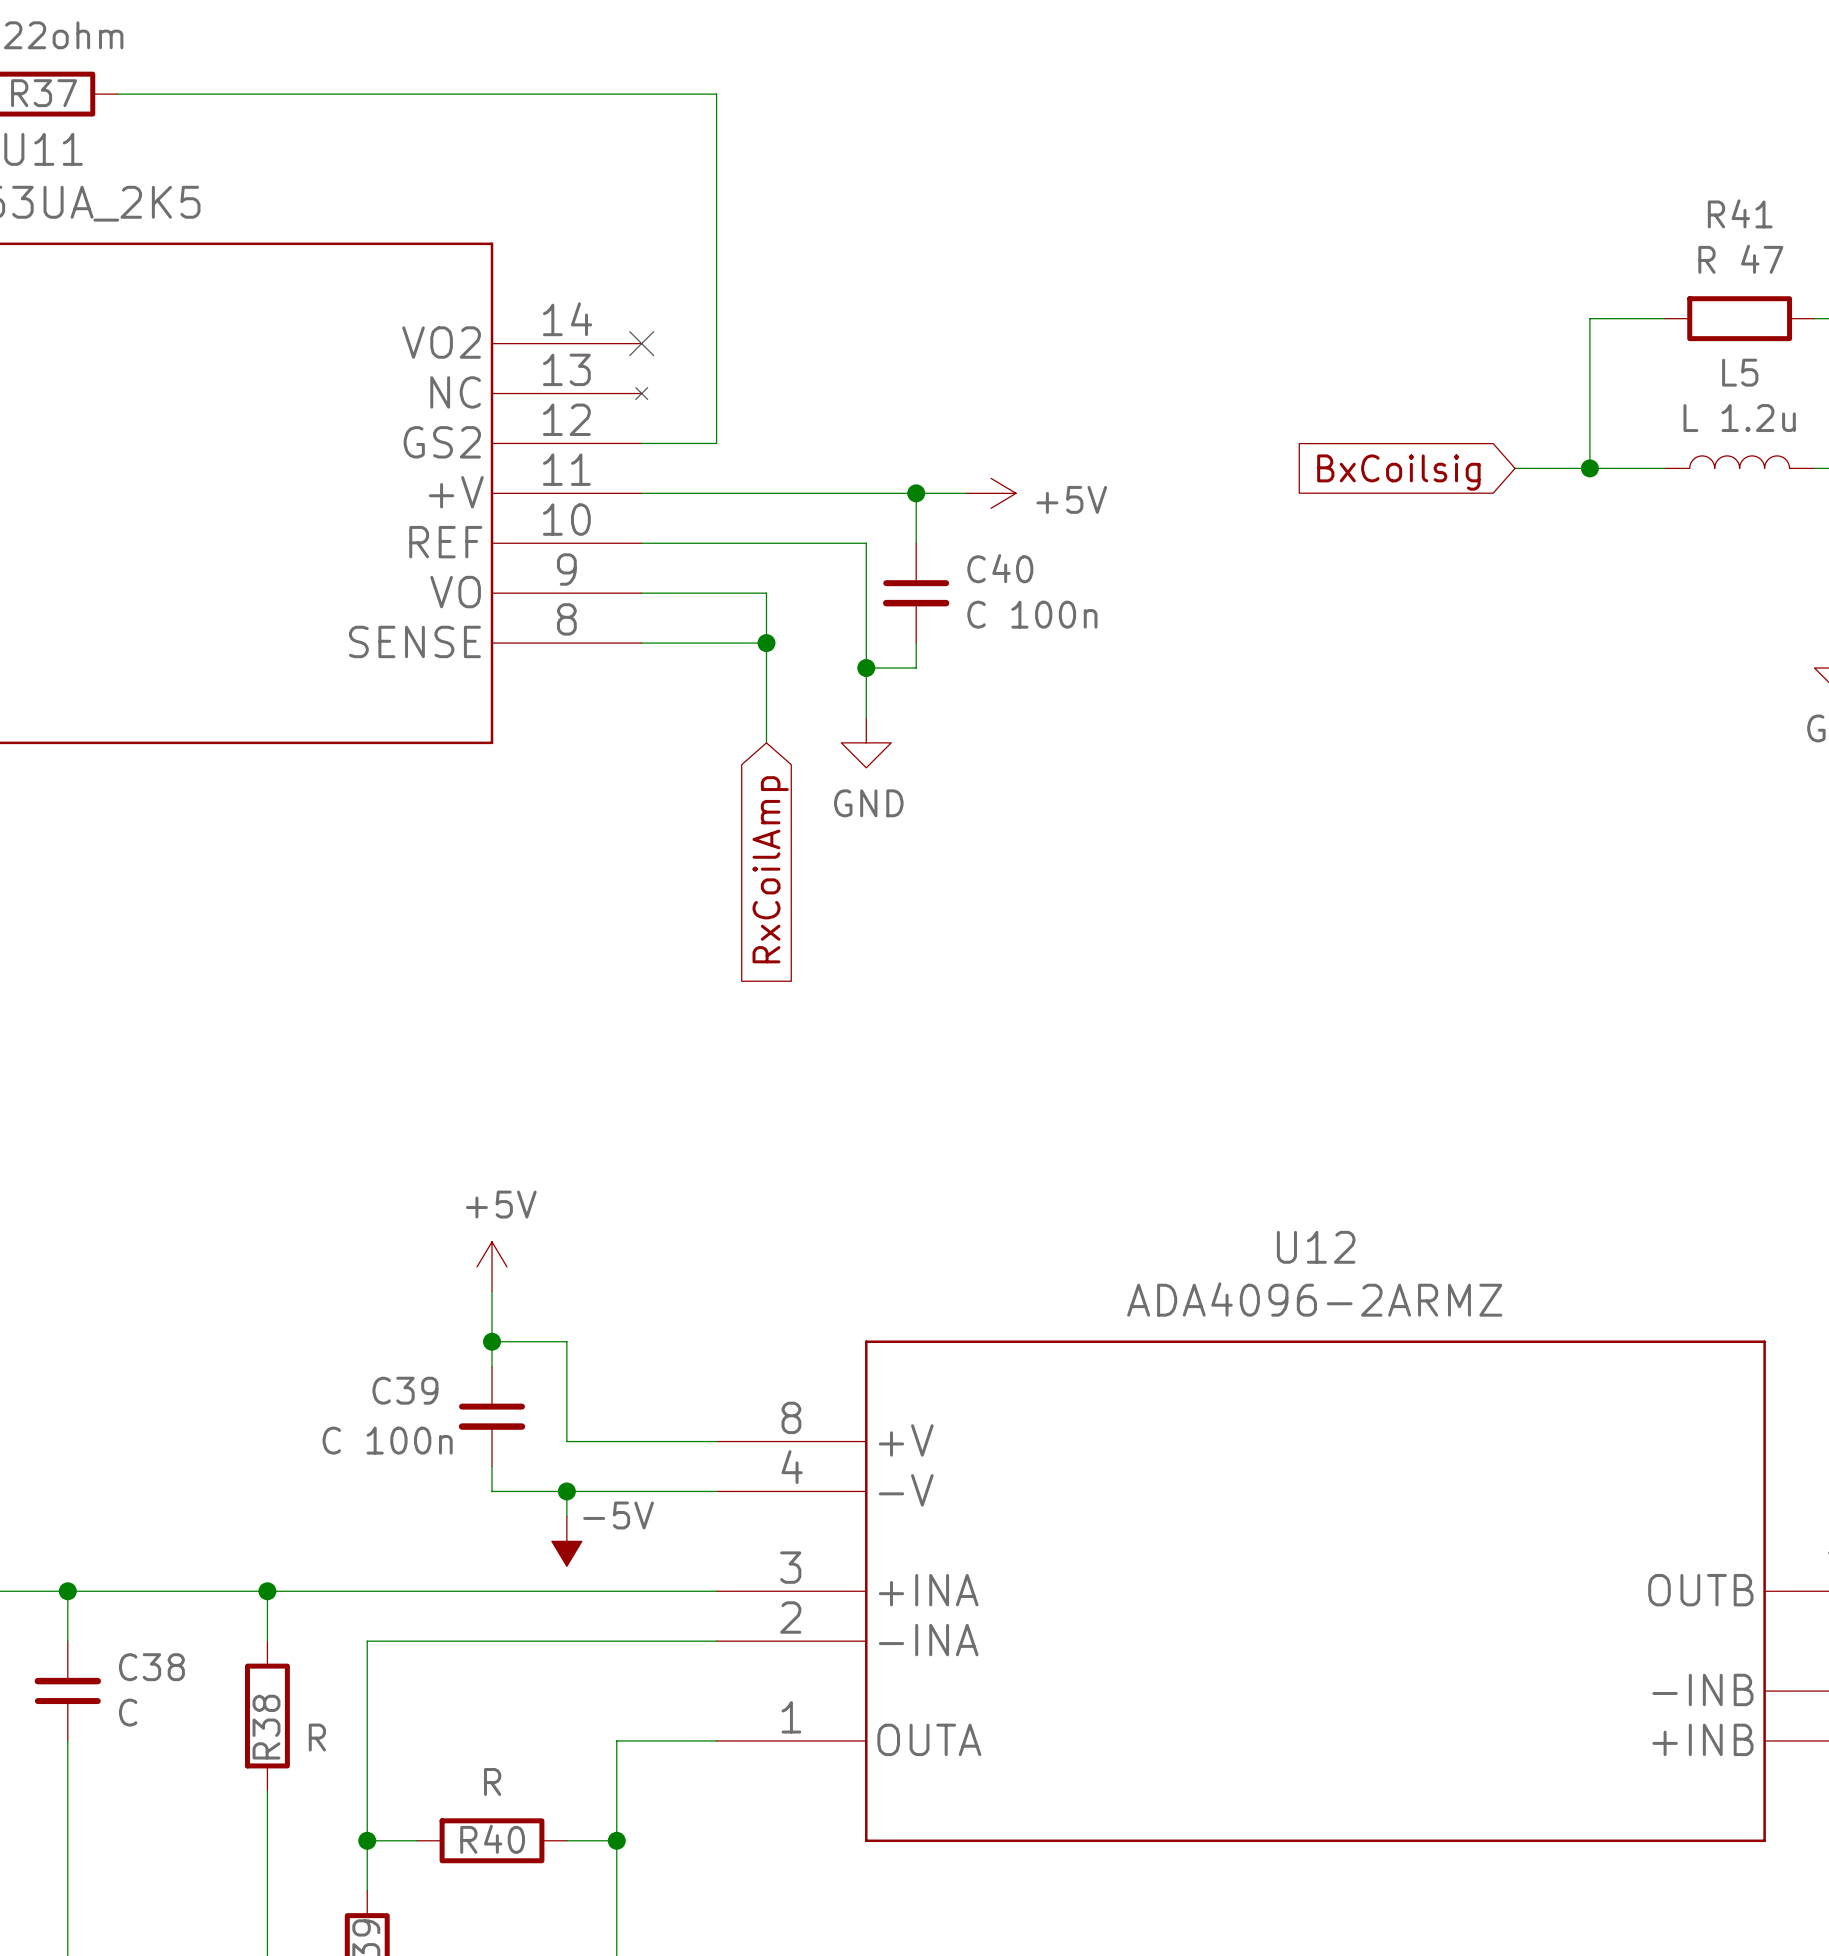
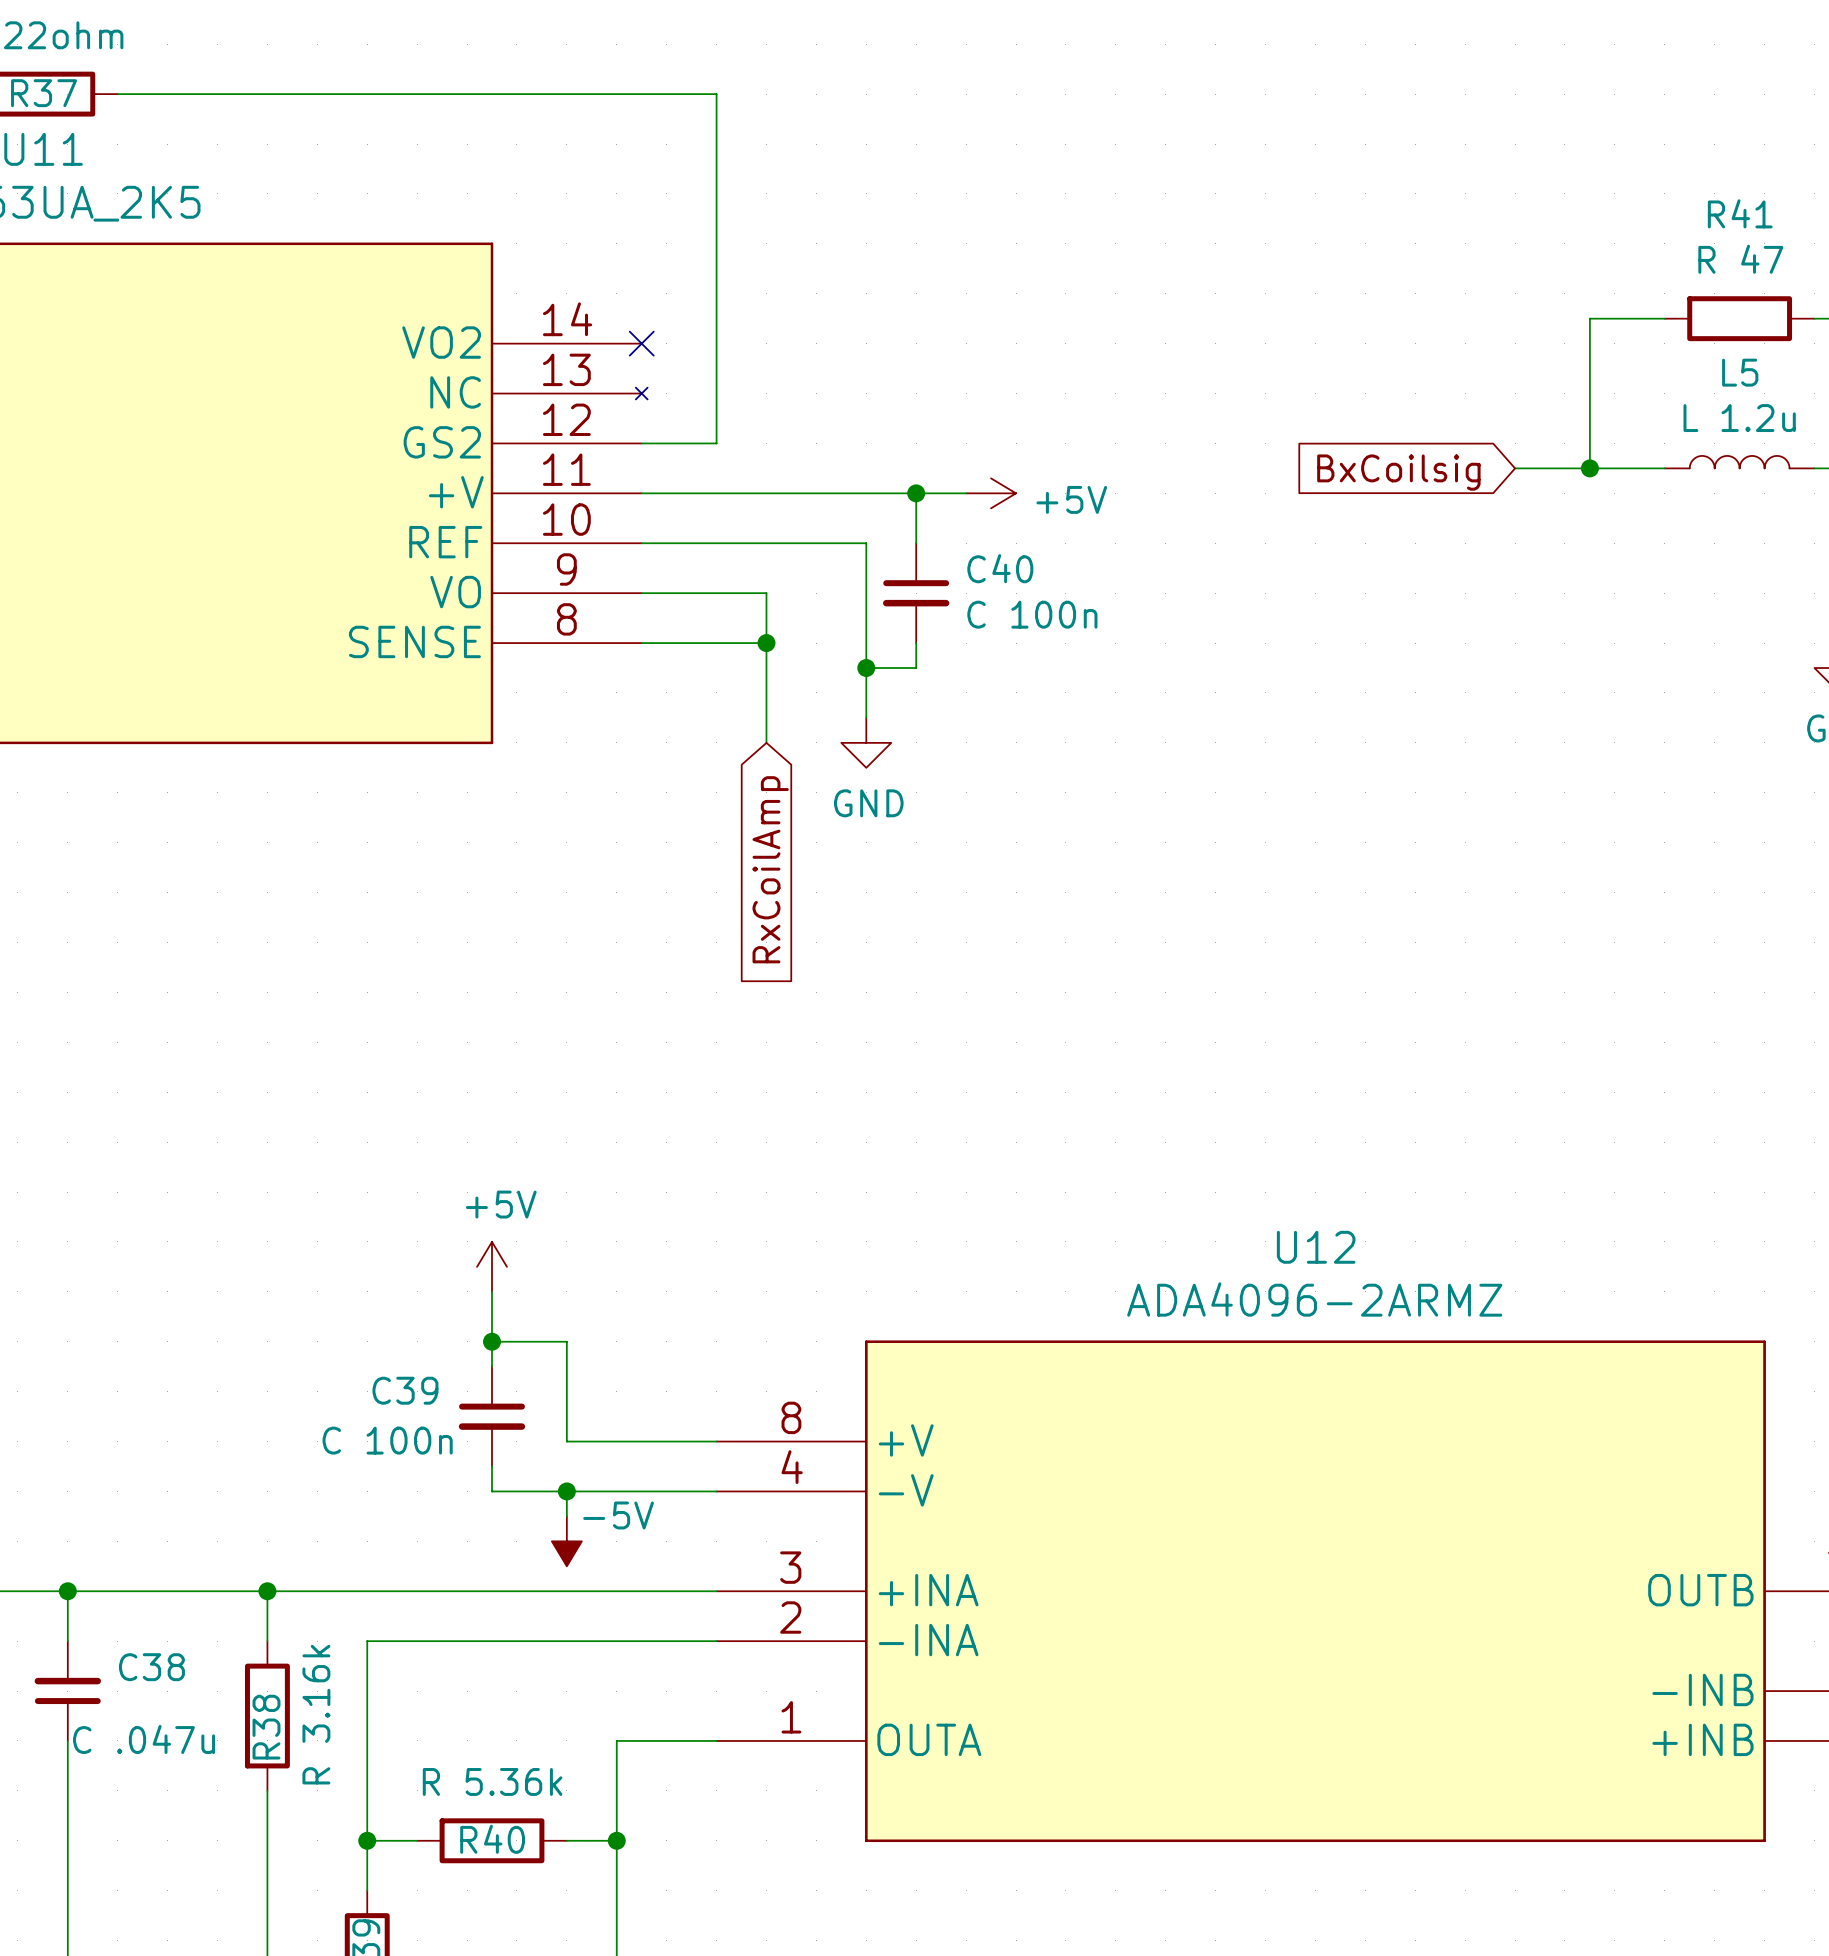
C38 value: C (128, 1712) -> C .047u (144, 1739)
R38 value: R (317, 1737) -> R 3.16k (316, 1714)
R40 value: R (492, 1781) -> R 5.36k (492, 1781)

